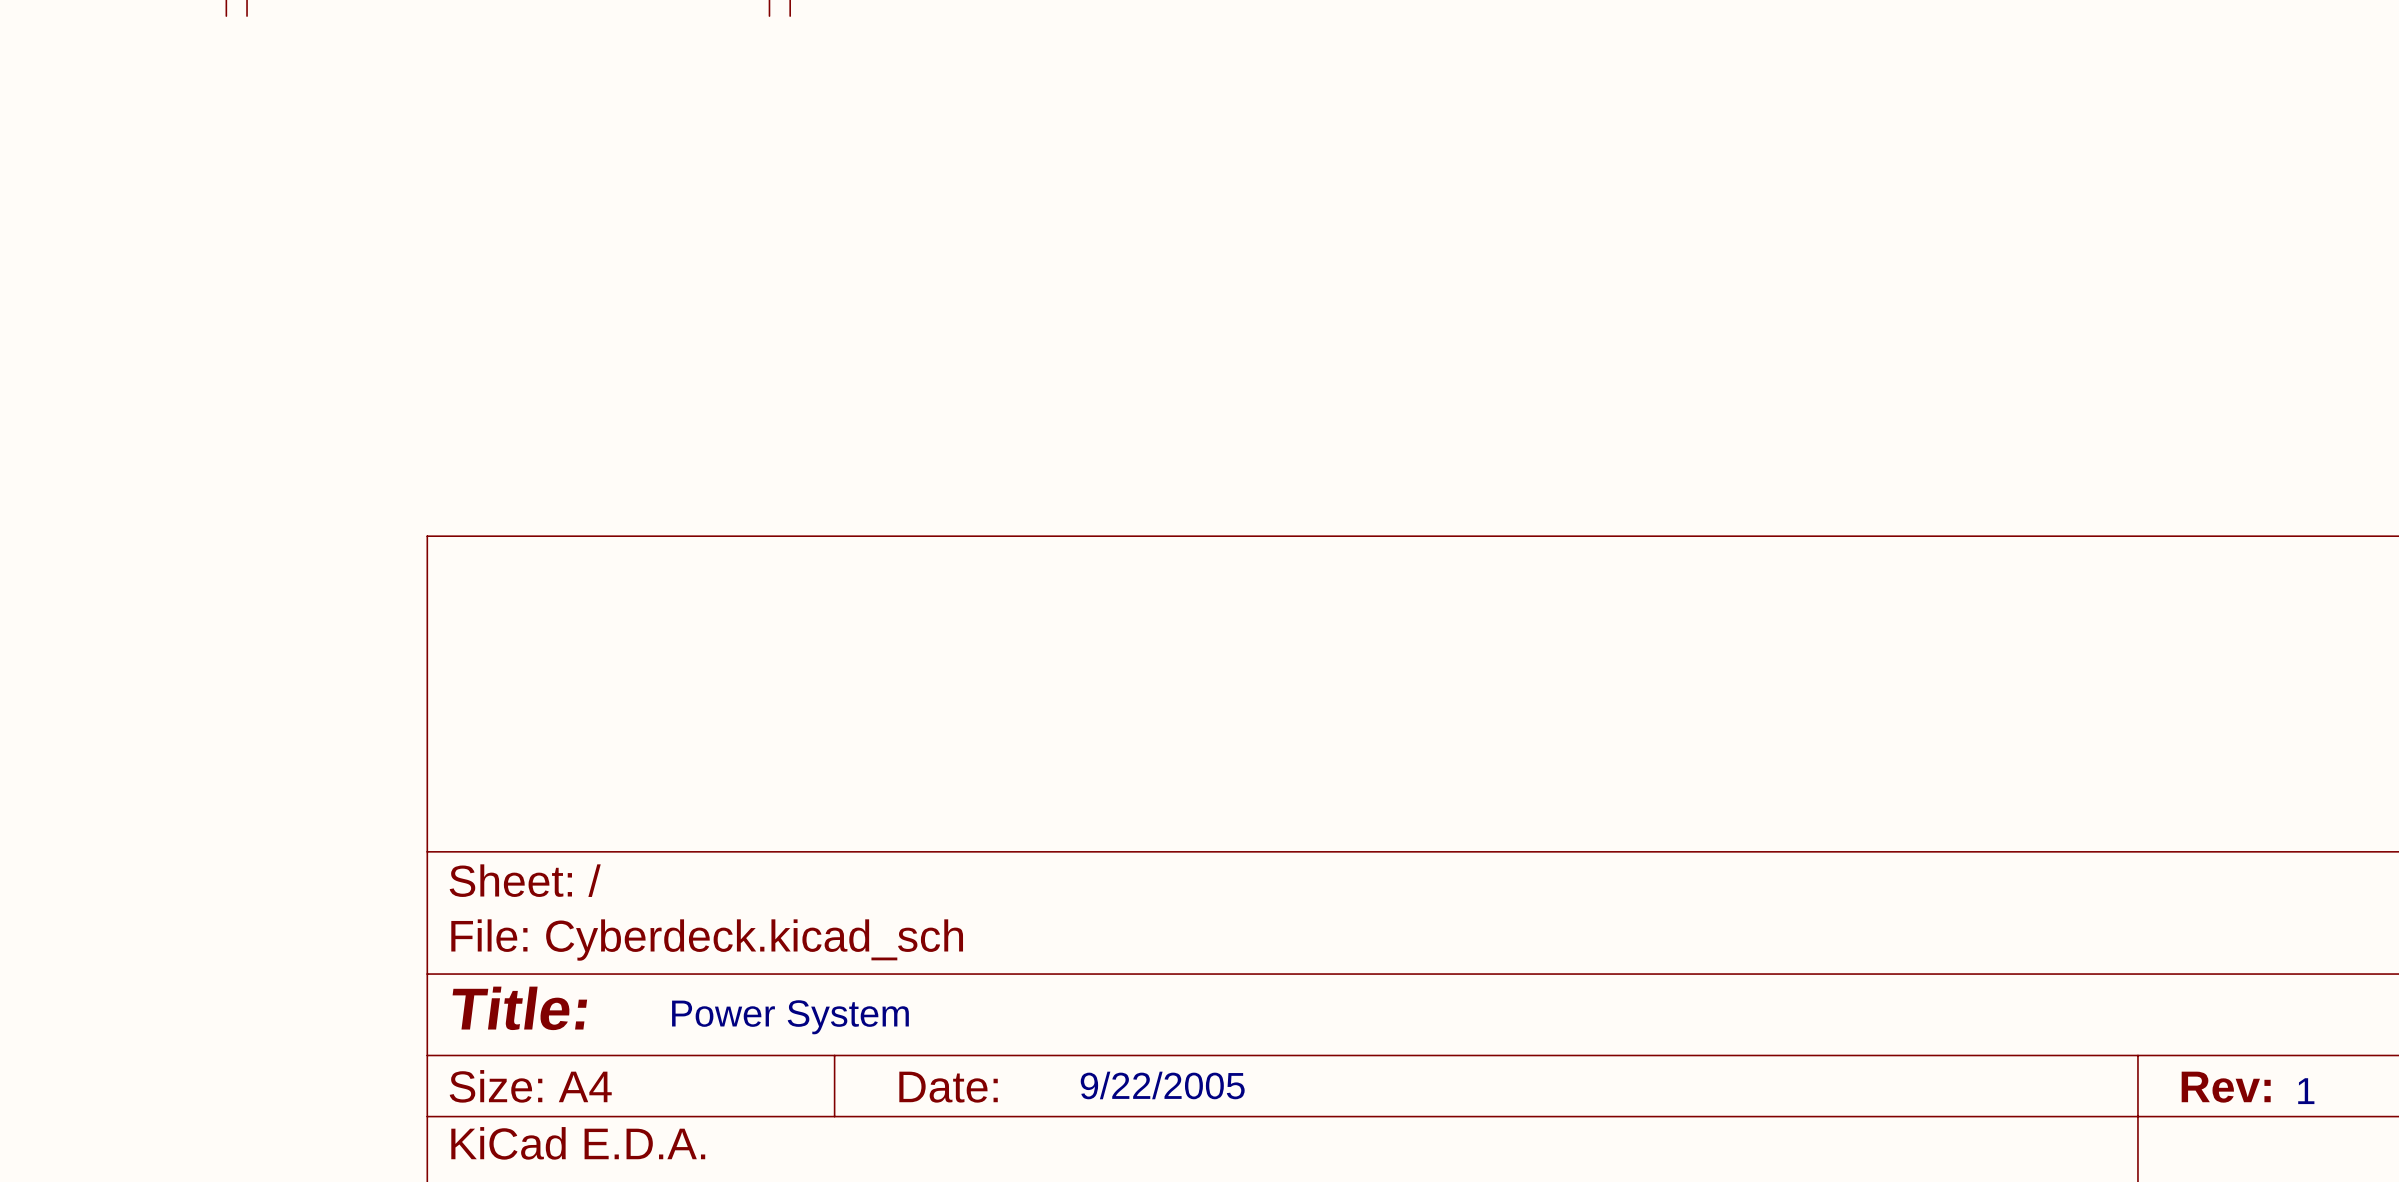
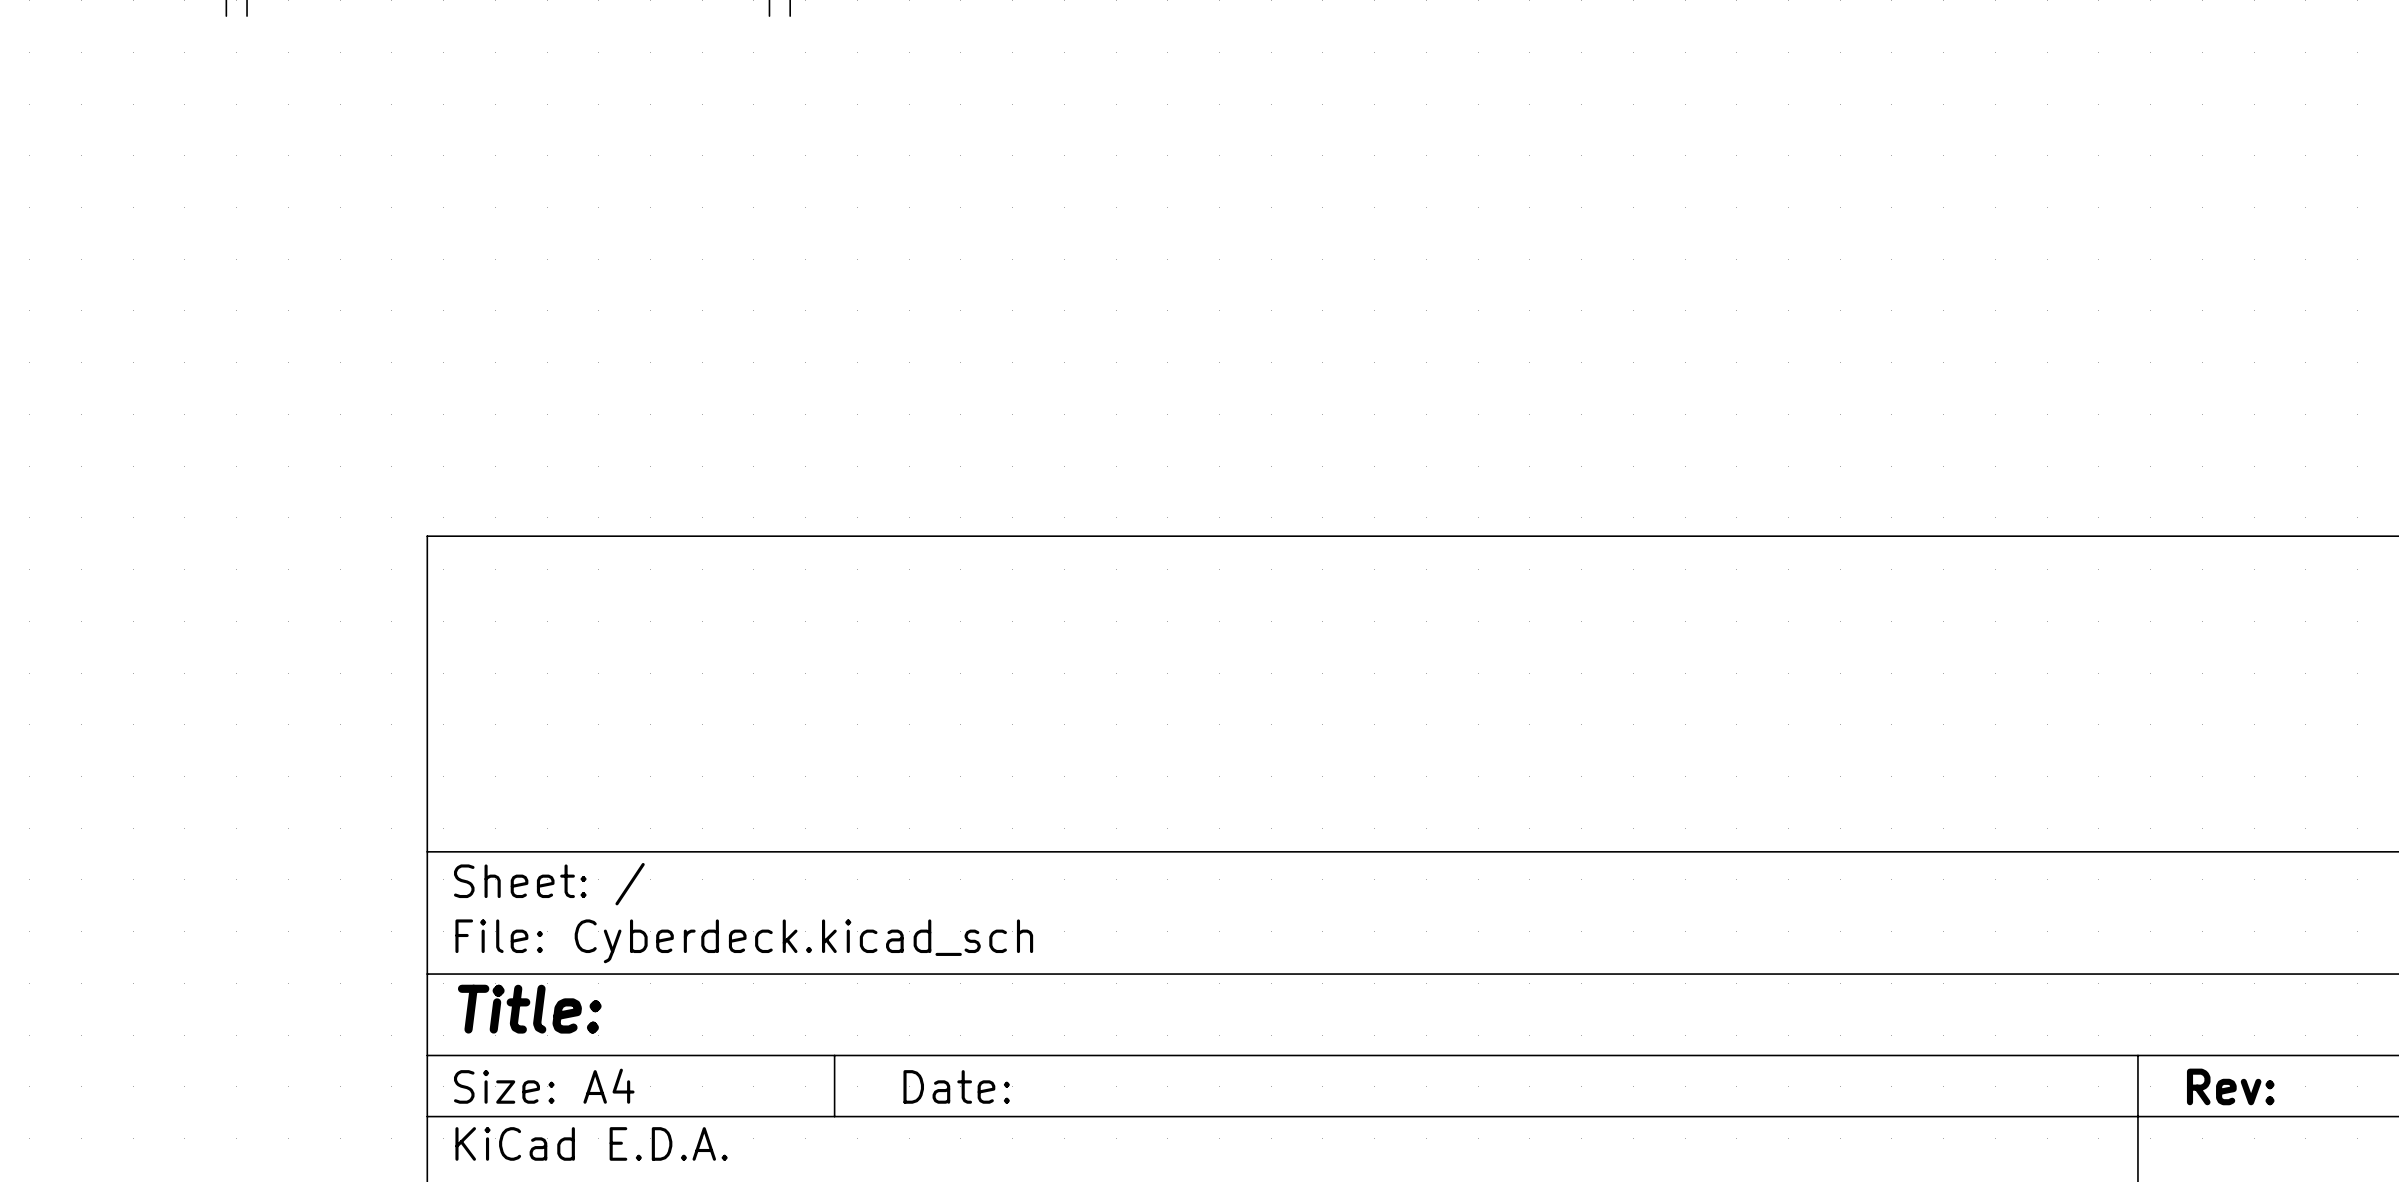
text: Power System (790, 1017) -> none
text: 9/22/2005 (1162, 1085) -> none
text: 1 (2306, 1091) -> none

